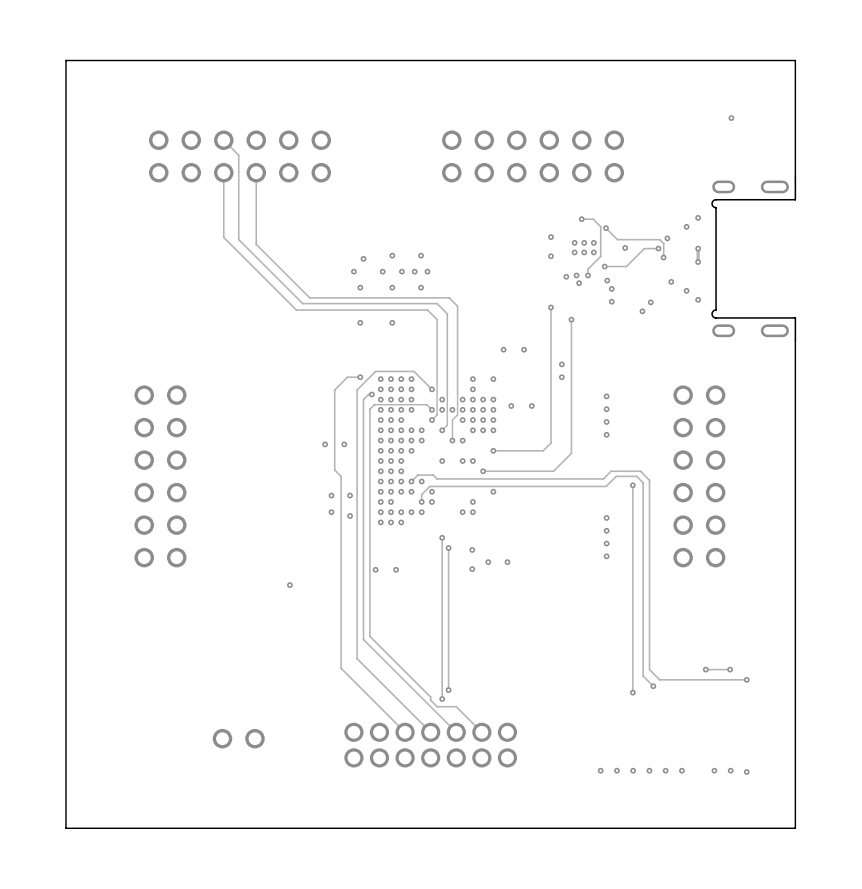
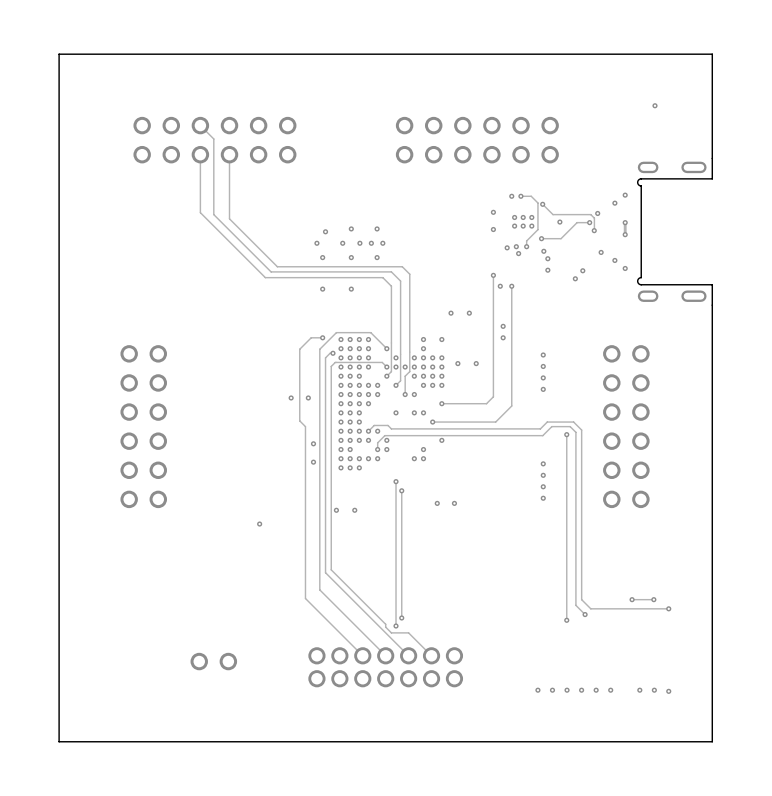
via: none -> (511, 196)
via: none -> (500, 286)
via: (331, 495) -> none
via: (331, 512) -> none
via: (472, 549) -> none
via: (472, 569) -> none

